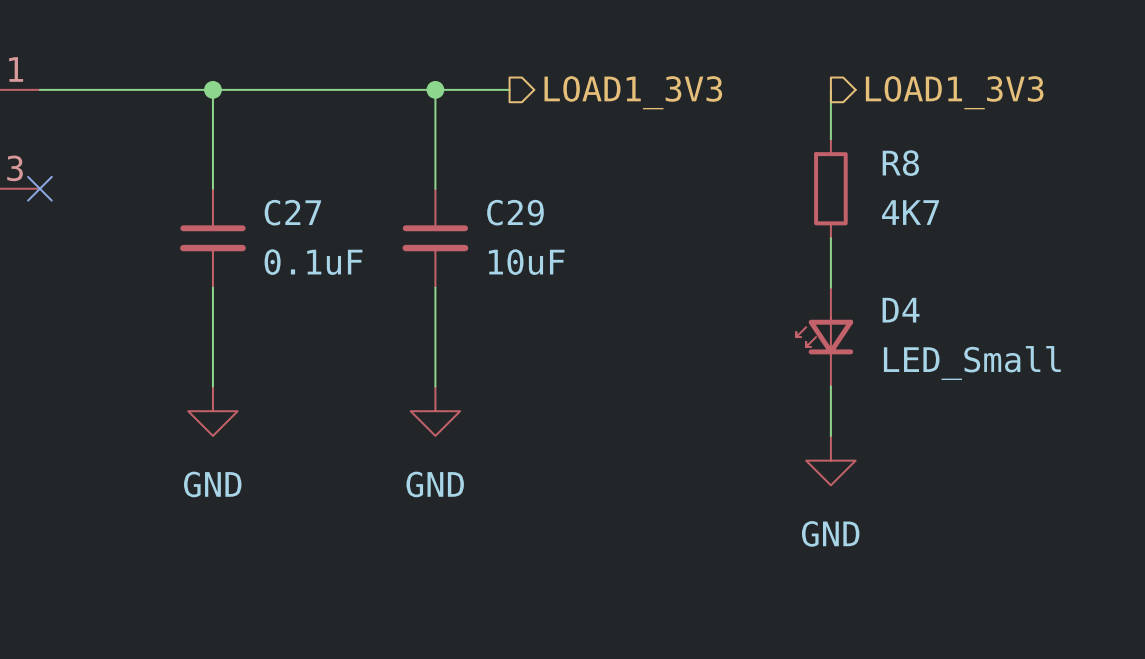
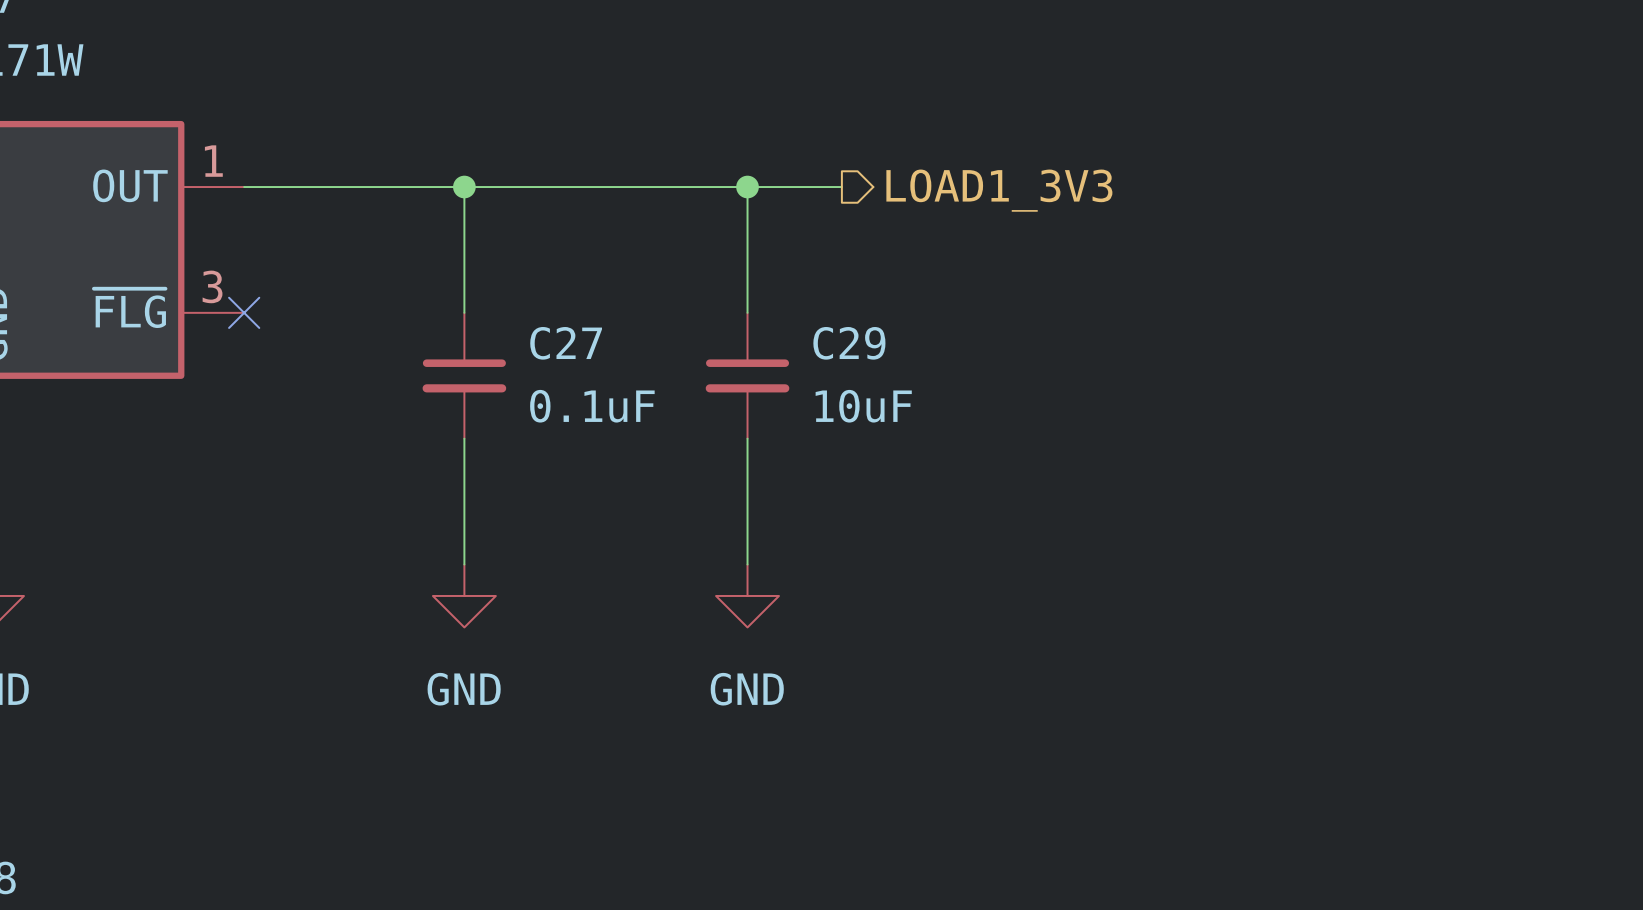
wire: (830, 89) (830, 139) -> none
hierarchical label: LOAD1_3V3 (954, 92) -> none
R8: 4K7 (830, 188) -> none
wire: (830, 238) (830, 287) -> none
D4: LED_Small (824, 337) -> none
wire: (830, 386) (830, 435) -> none
power symbol: GND (830, 460) -> none

